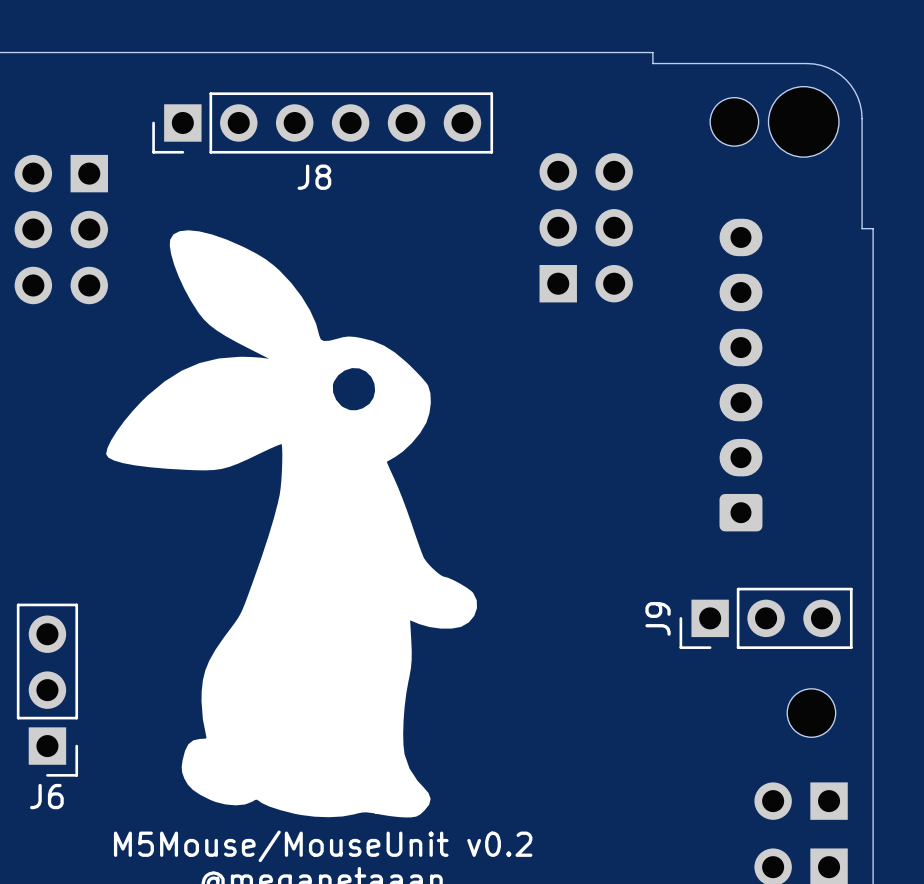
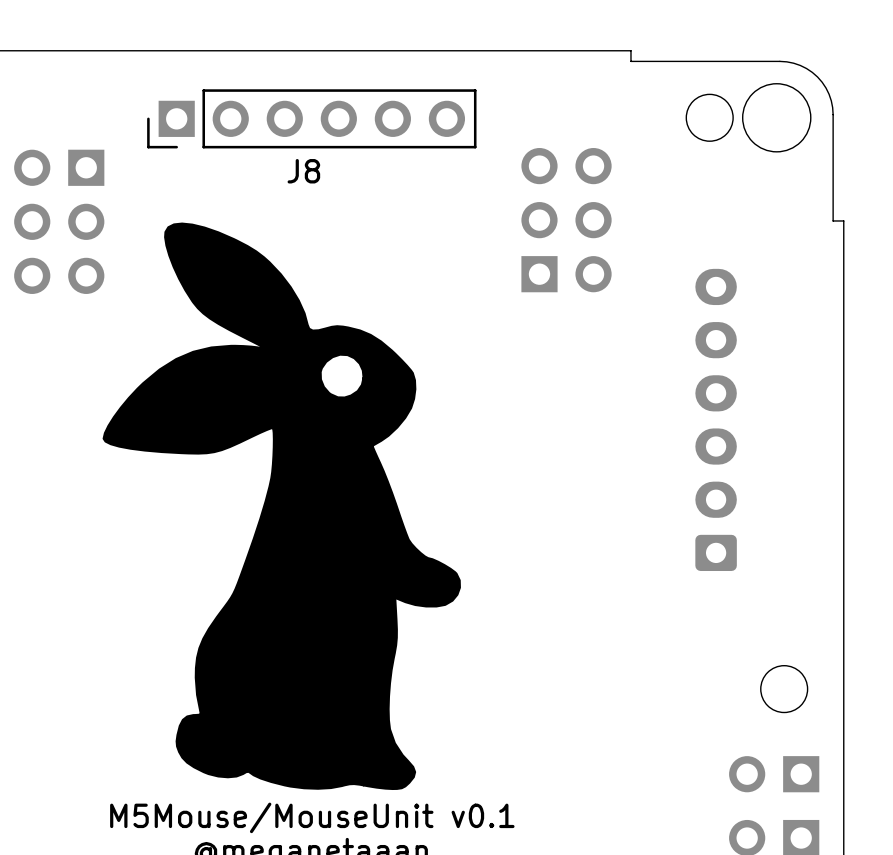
part position: (740, 375) -> (716, 419)
J9: (766, 618) -> none
J6: (47, 690) -> none
text: M5Mouse/MouseUnit v0.2 (323, 846) -> M5Mouse/MouseUnit v0.1 (312, 817)

